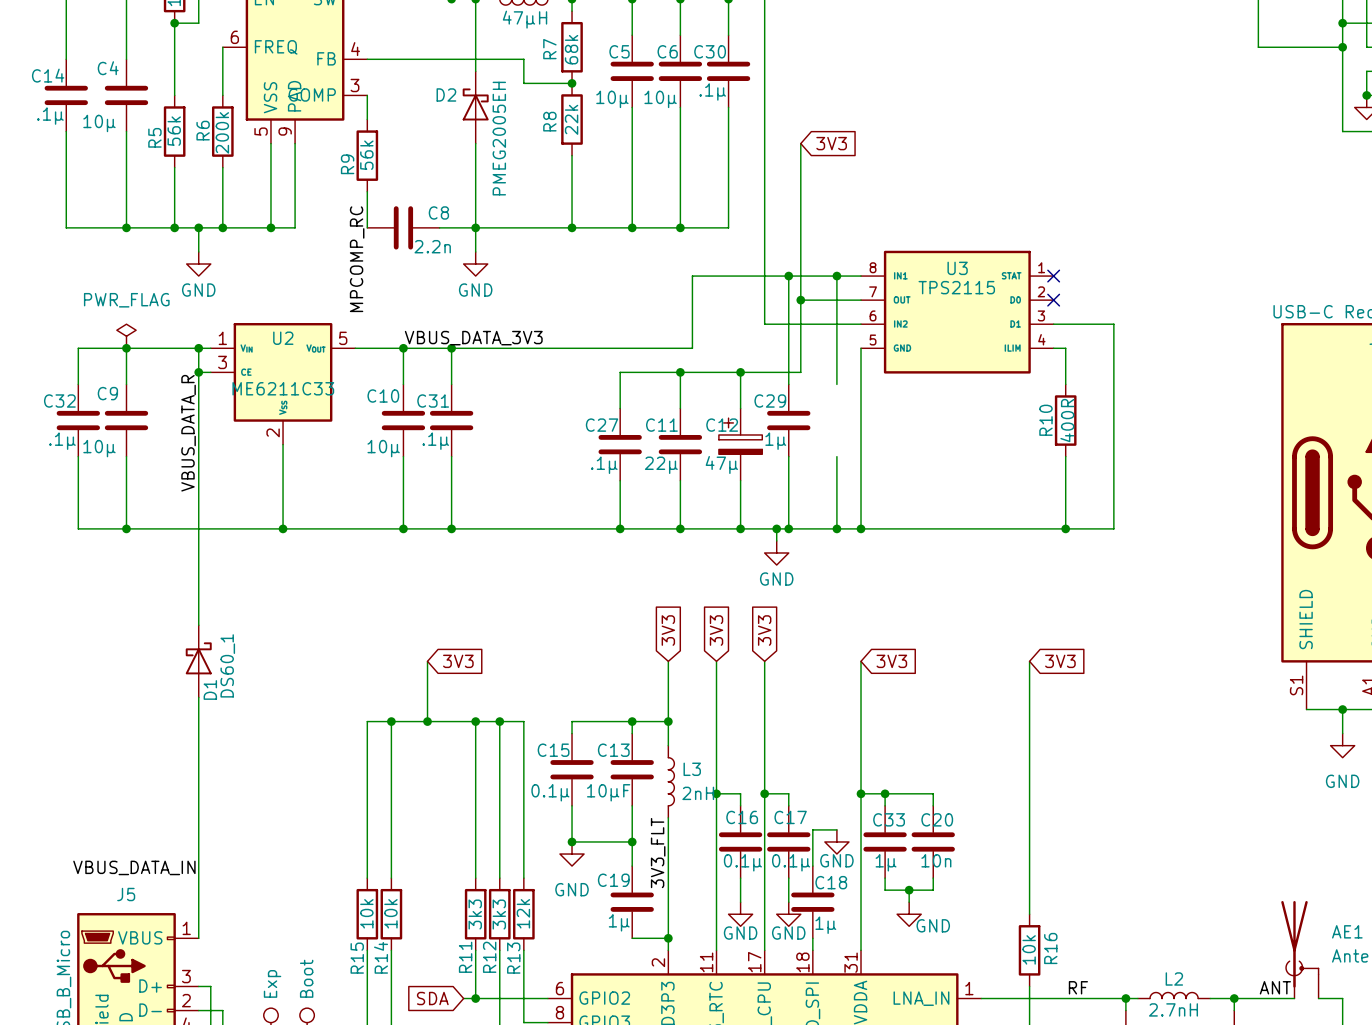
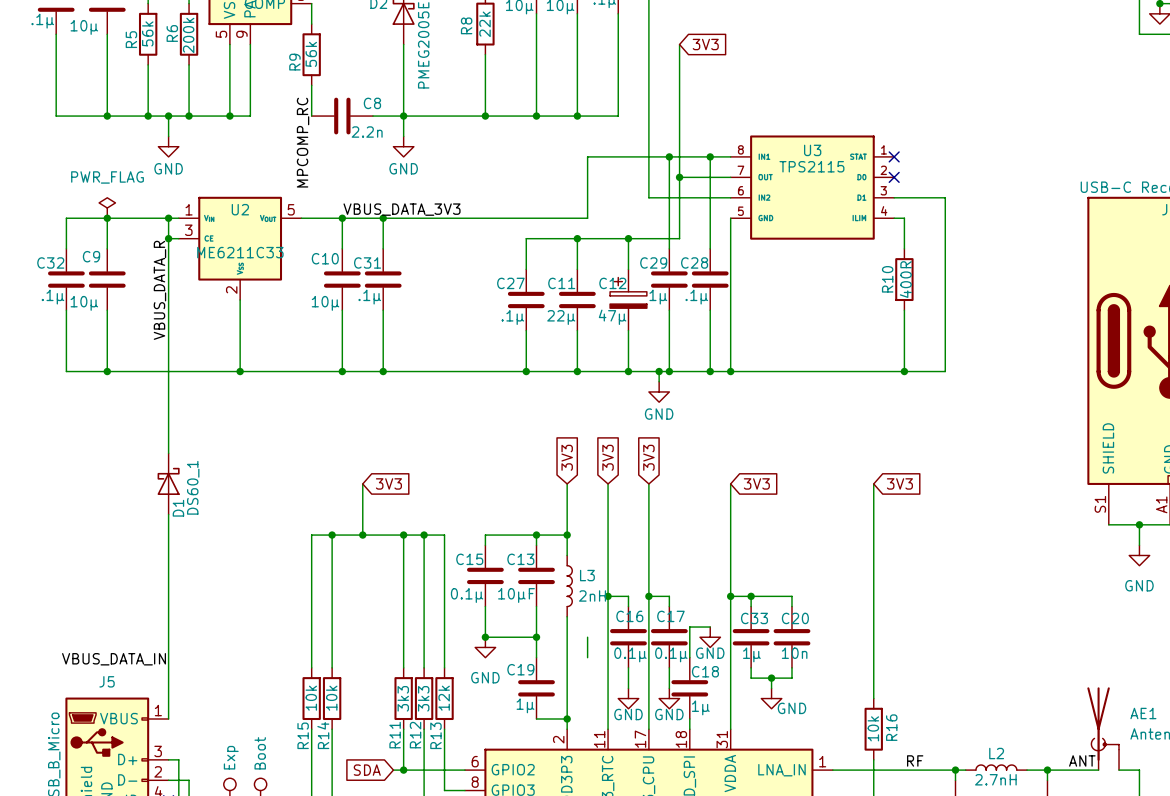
C28: none -> .1µ (710, 279)
wire: none -> (587, 637) (587, 657)
label: 3V3_FLT (658, 853) -> none

